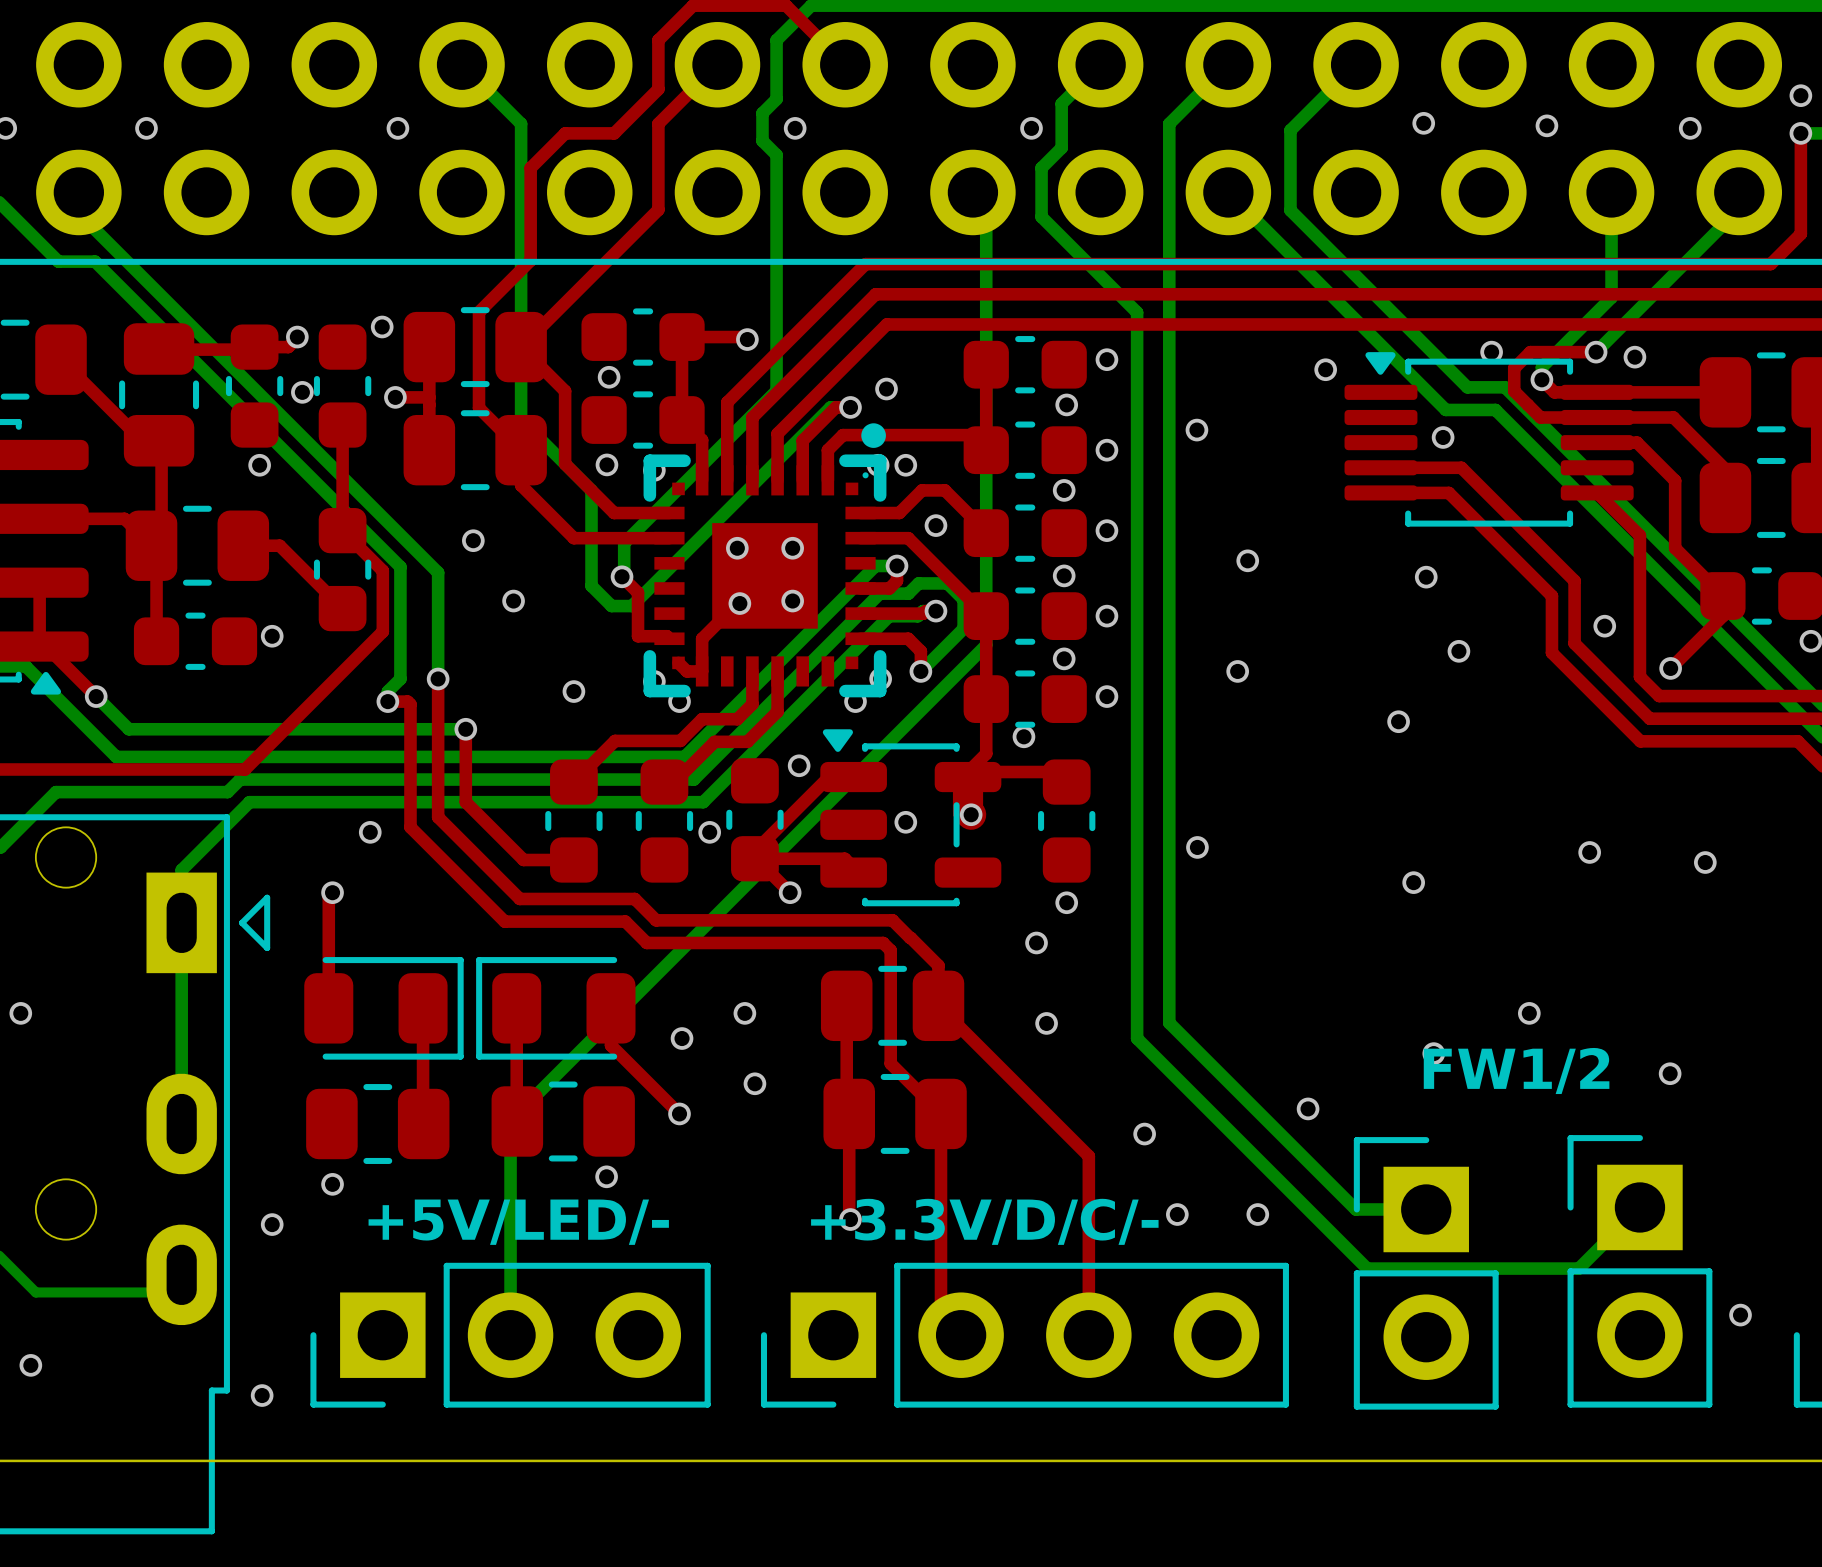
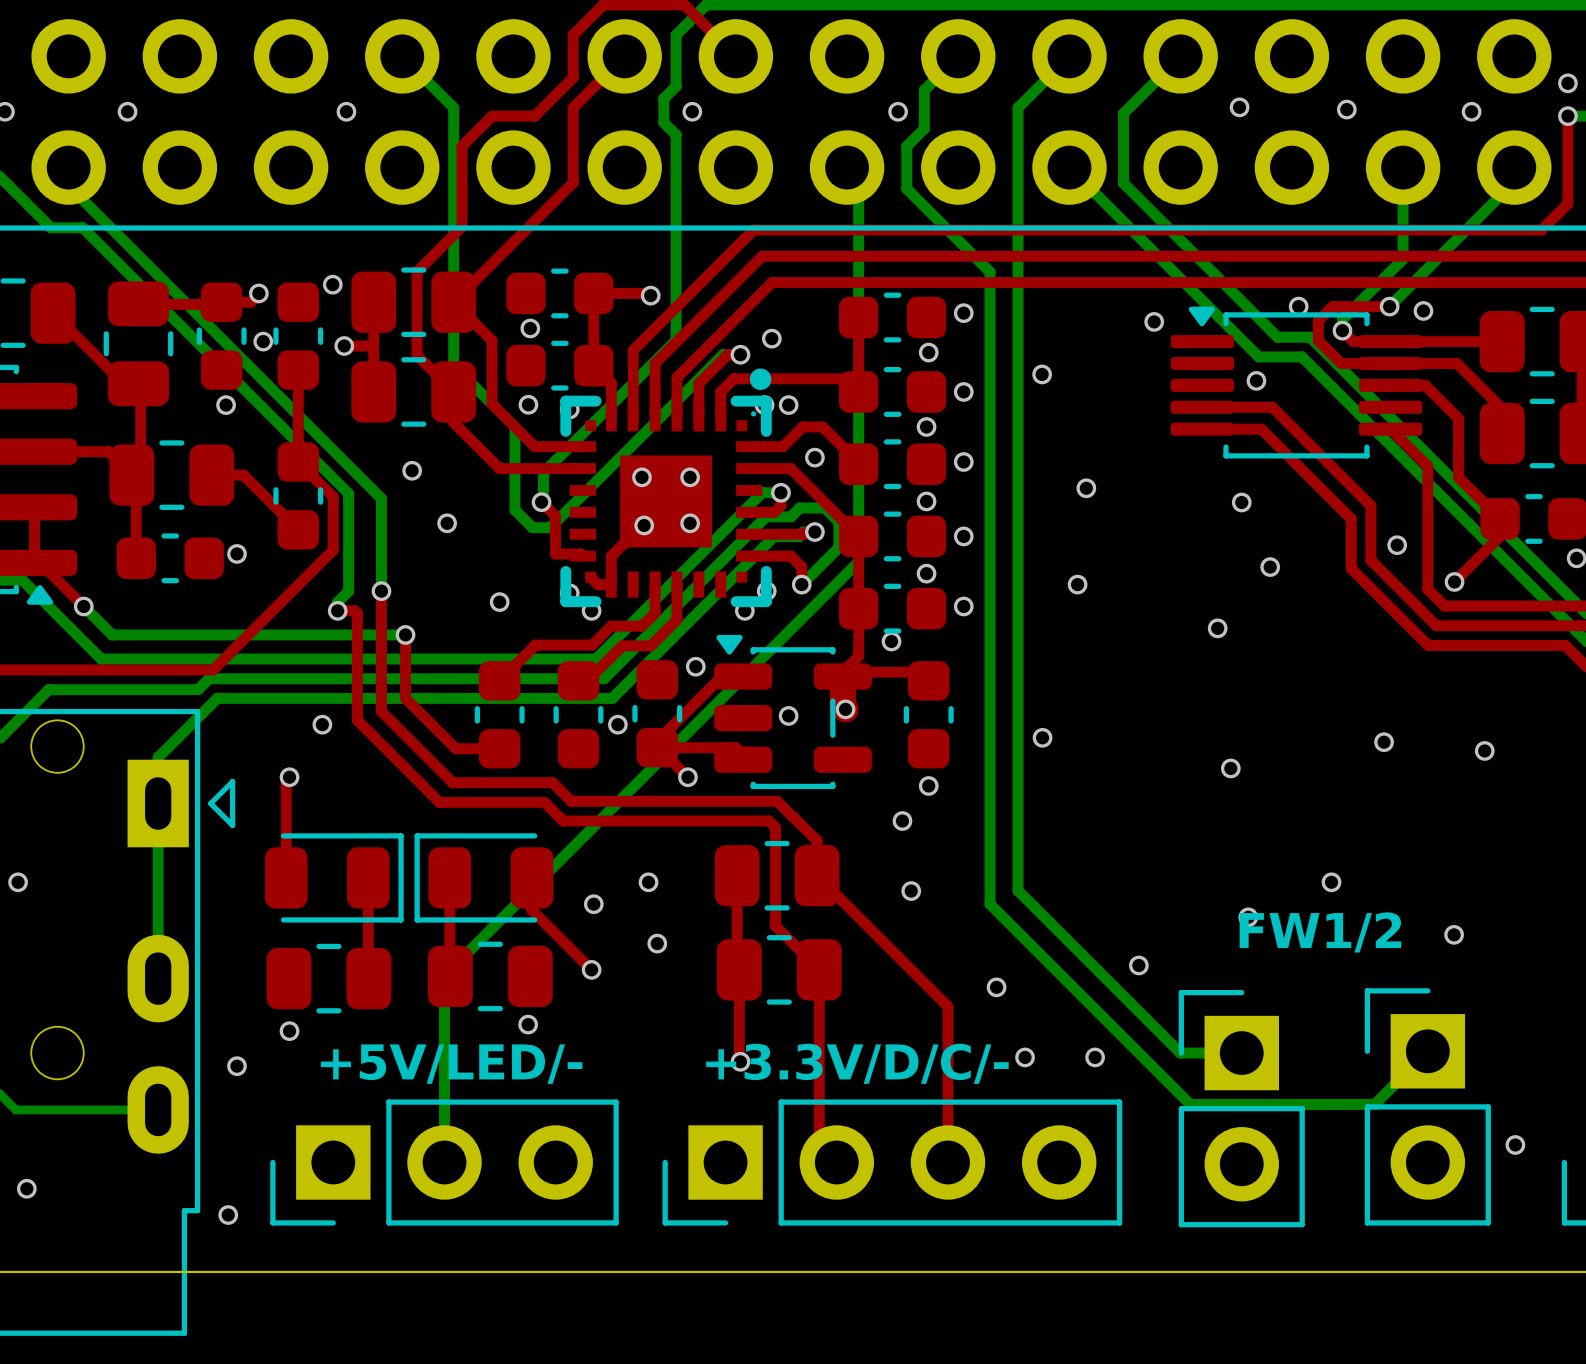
bottom track: (18, 1274) (35, 1292) (164, 1292) (181, 1274) -> (15, 1109) (158, 1109)

